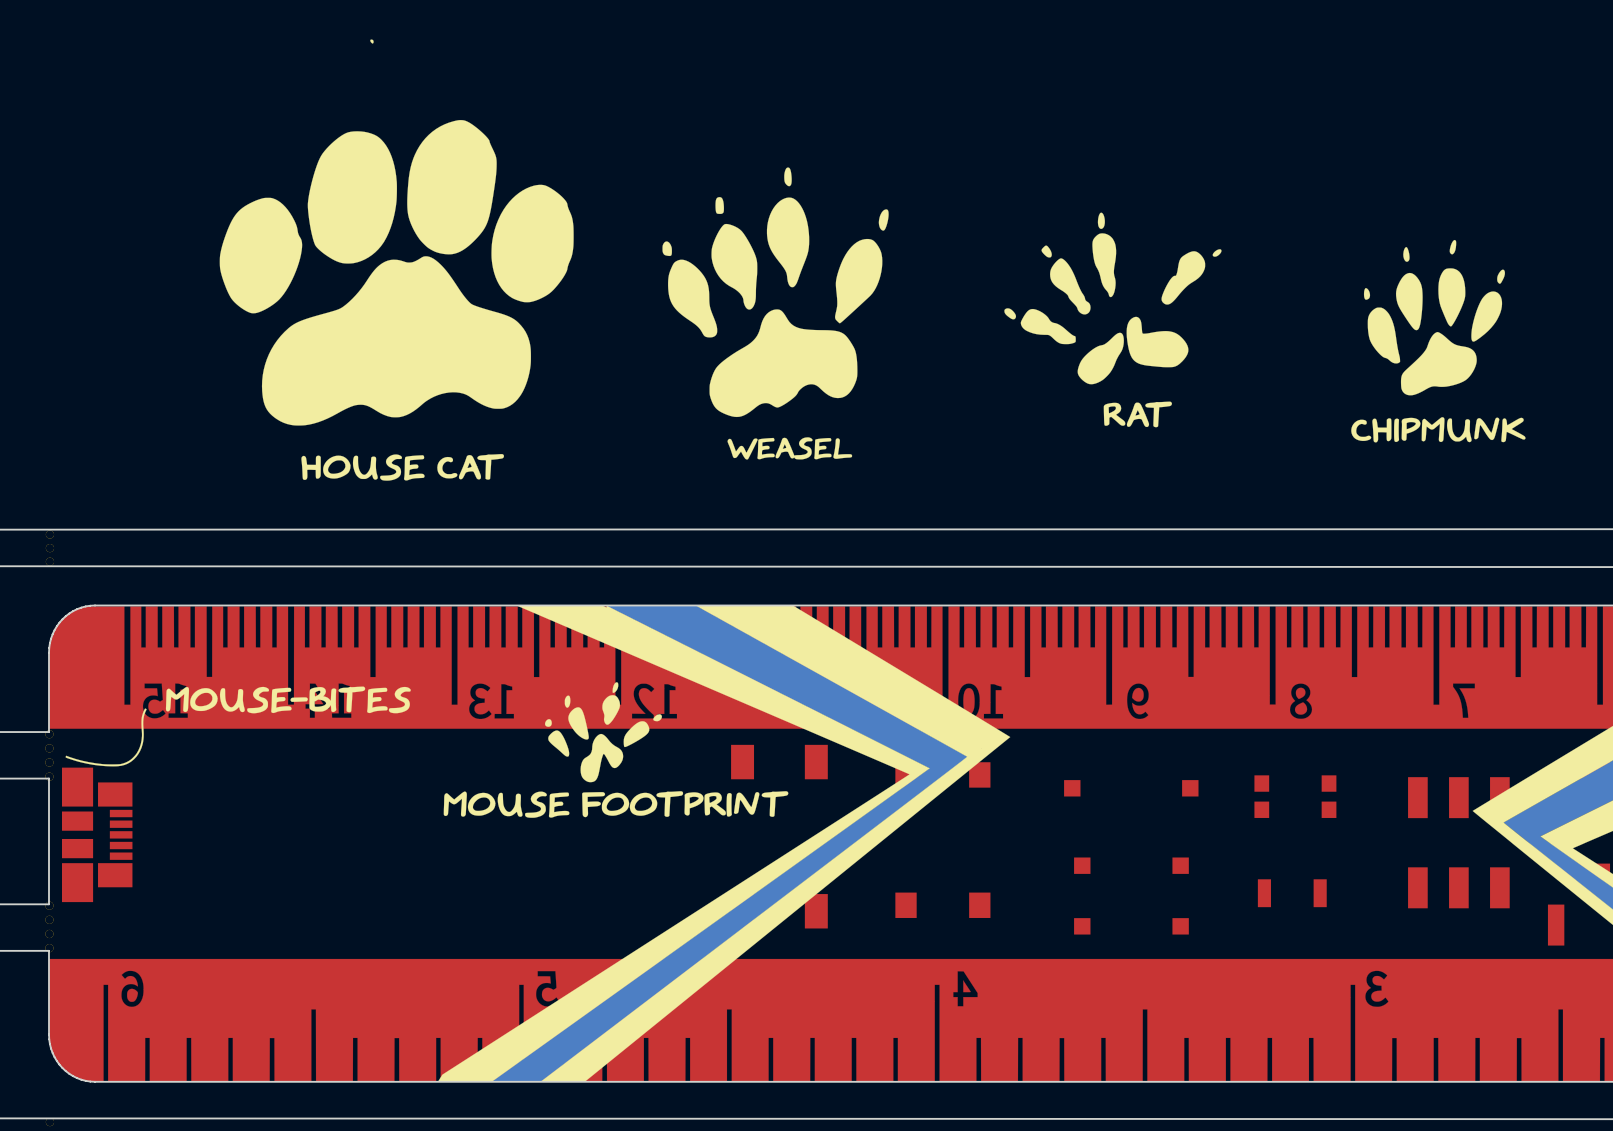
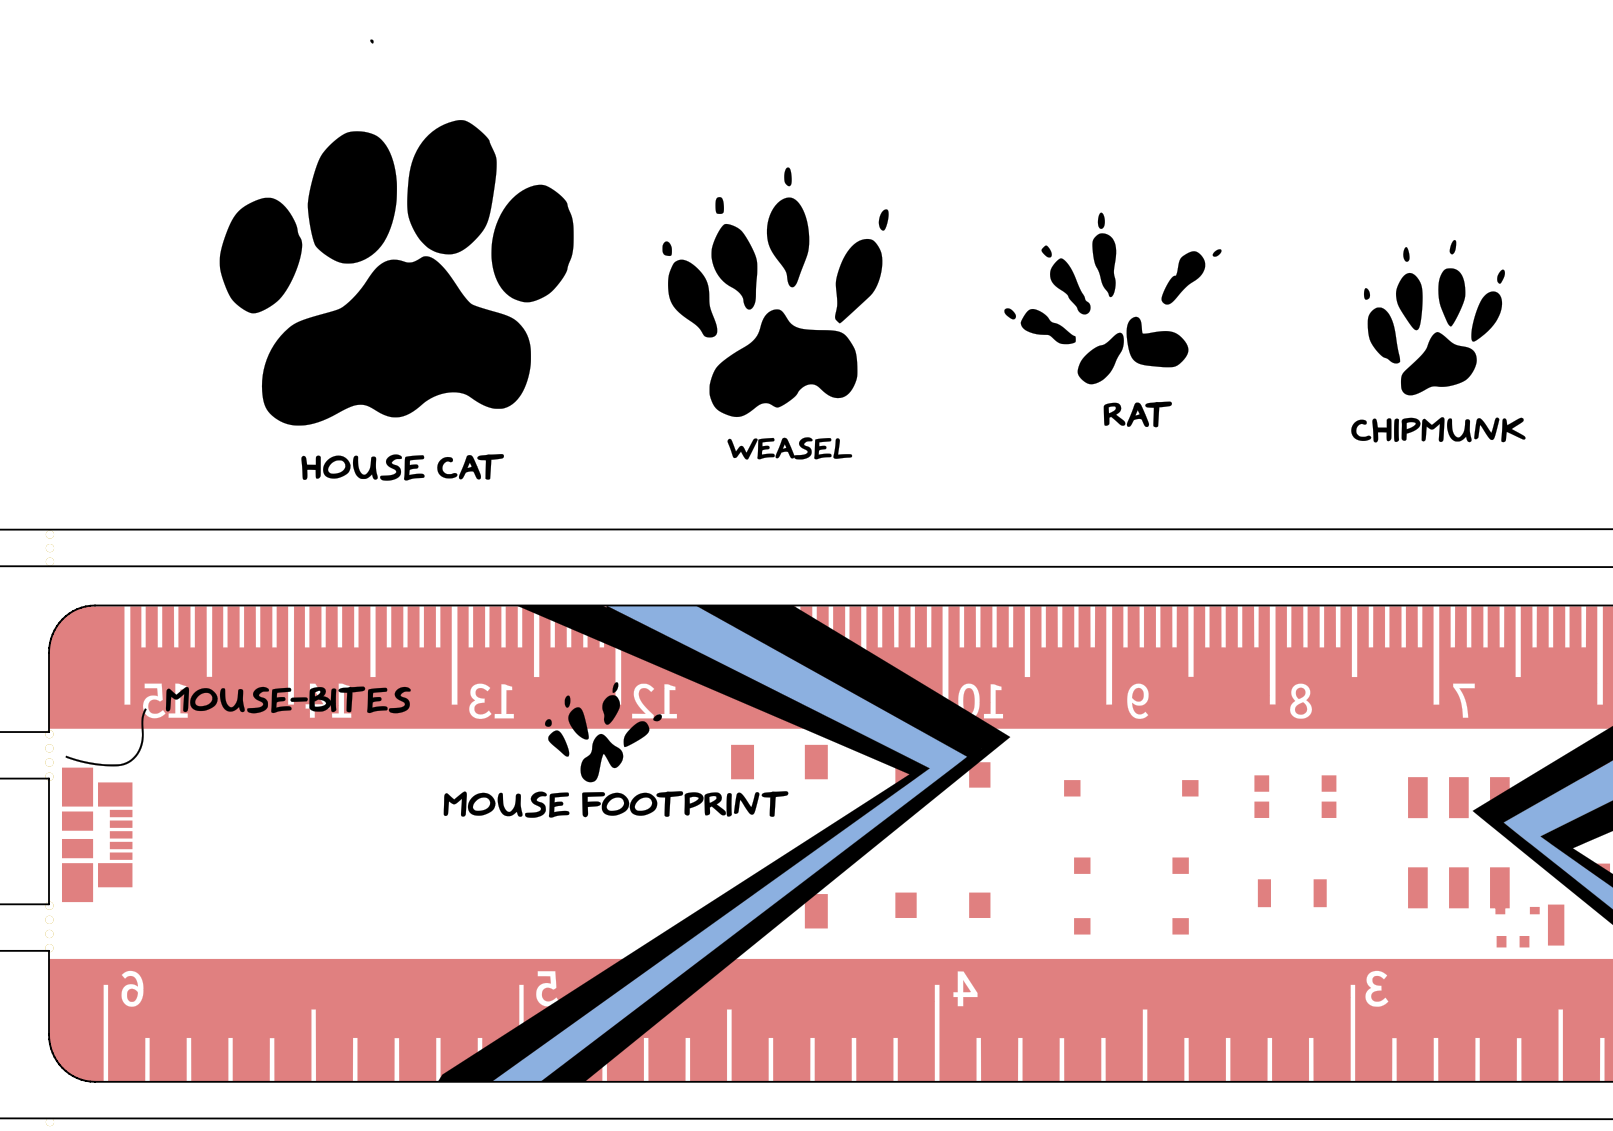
part: none -> (1517, 910)
part: none -> (1513, 941)

